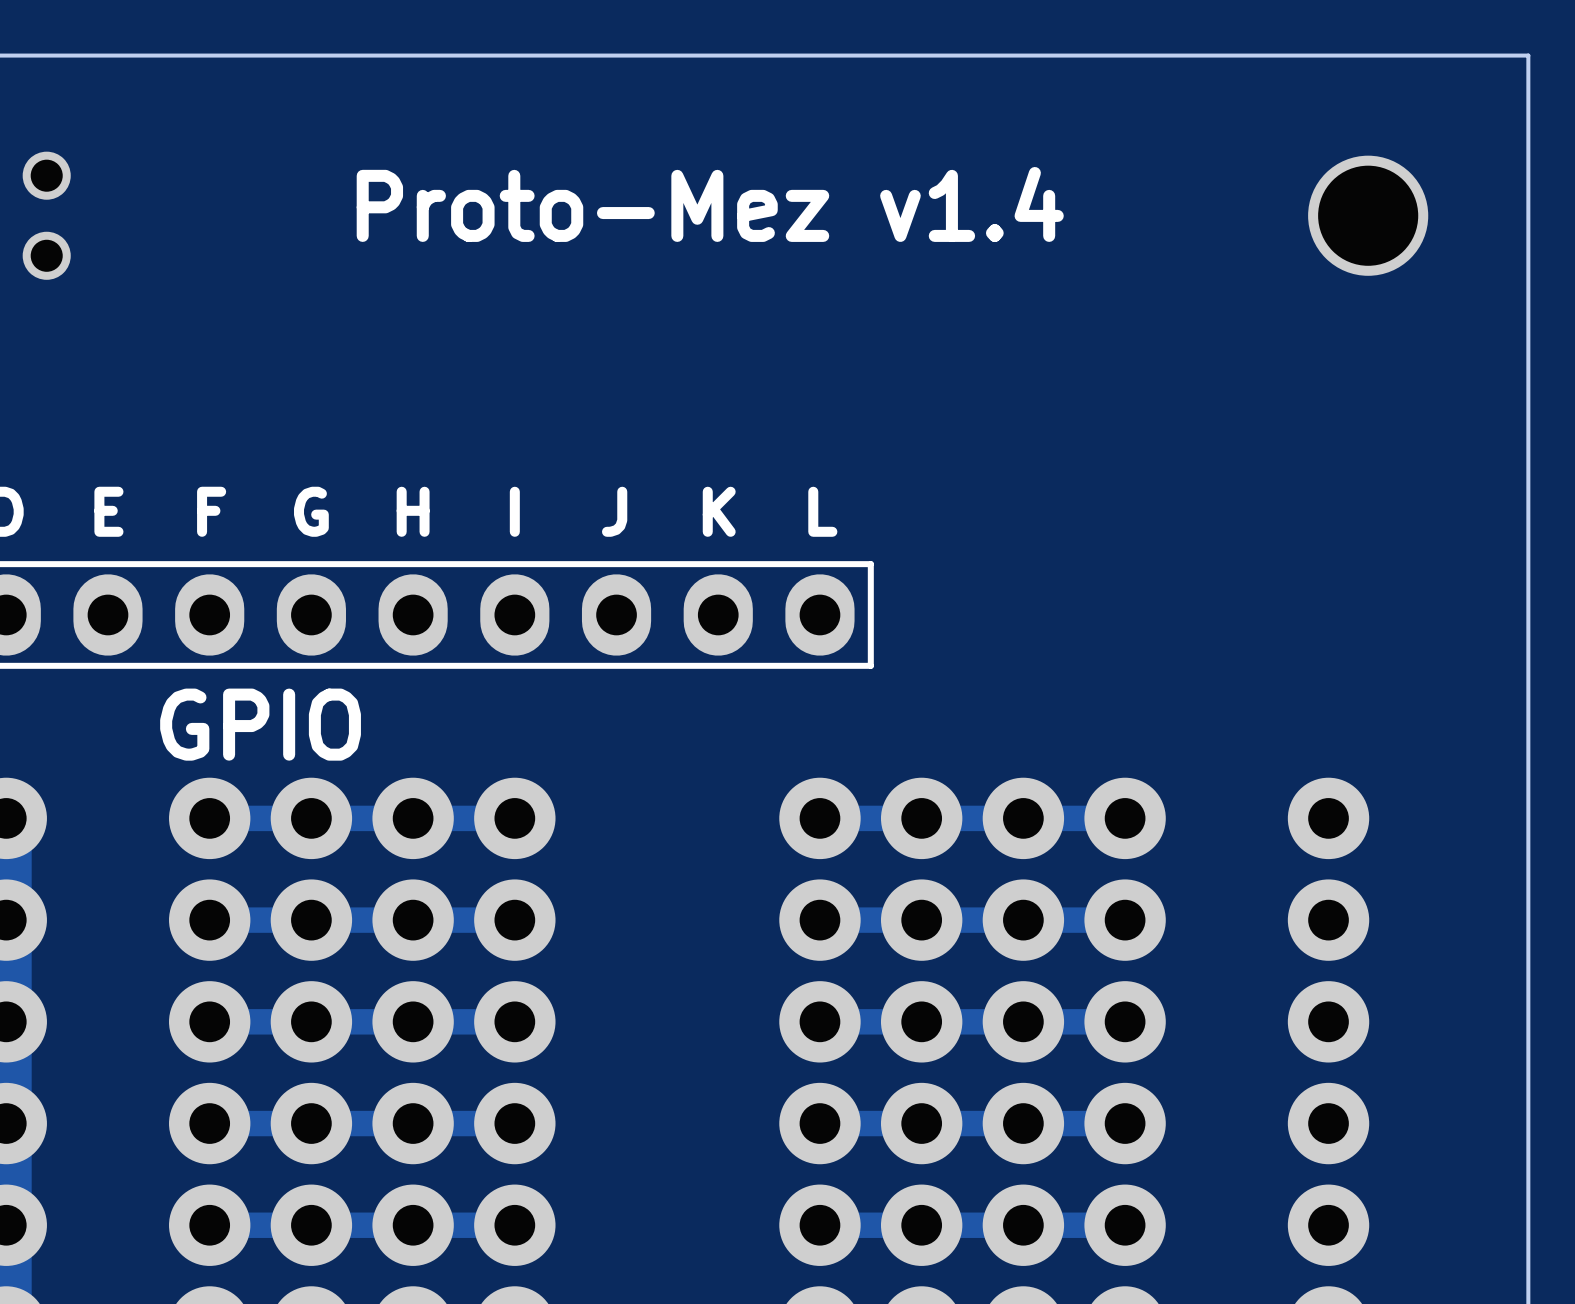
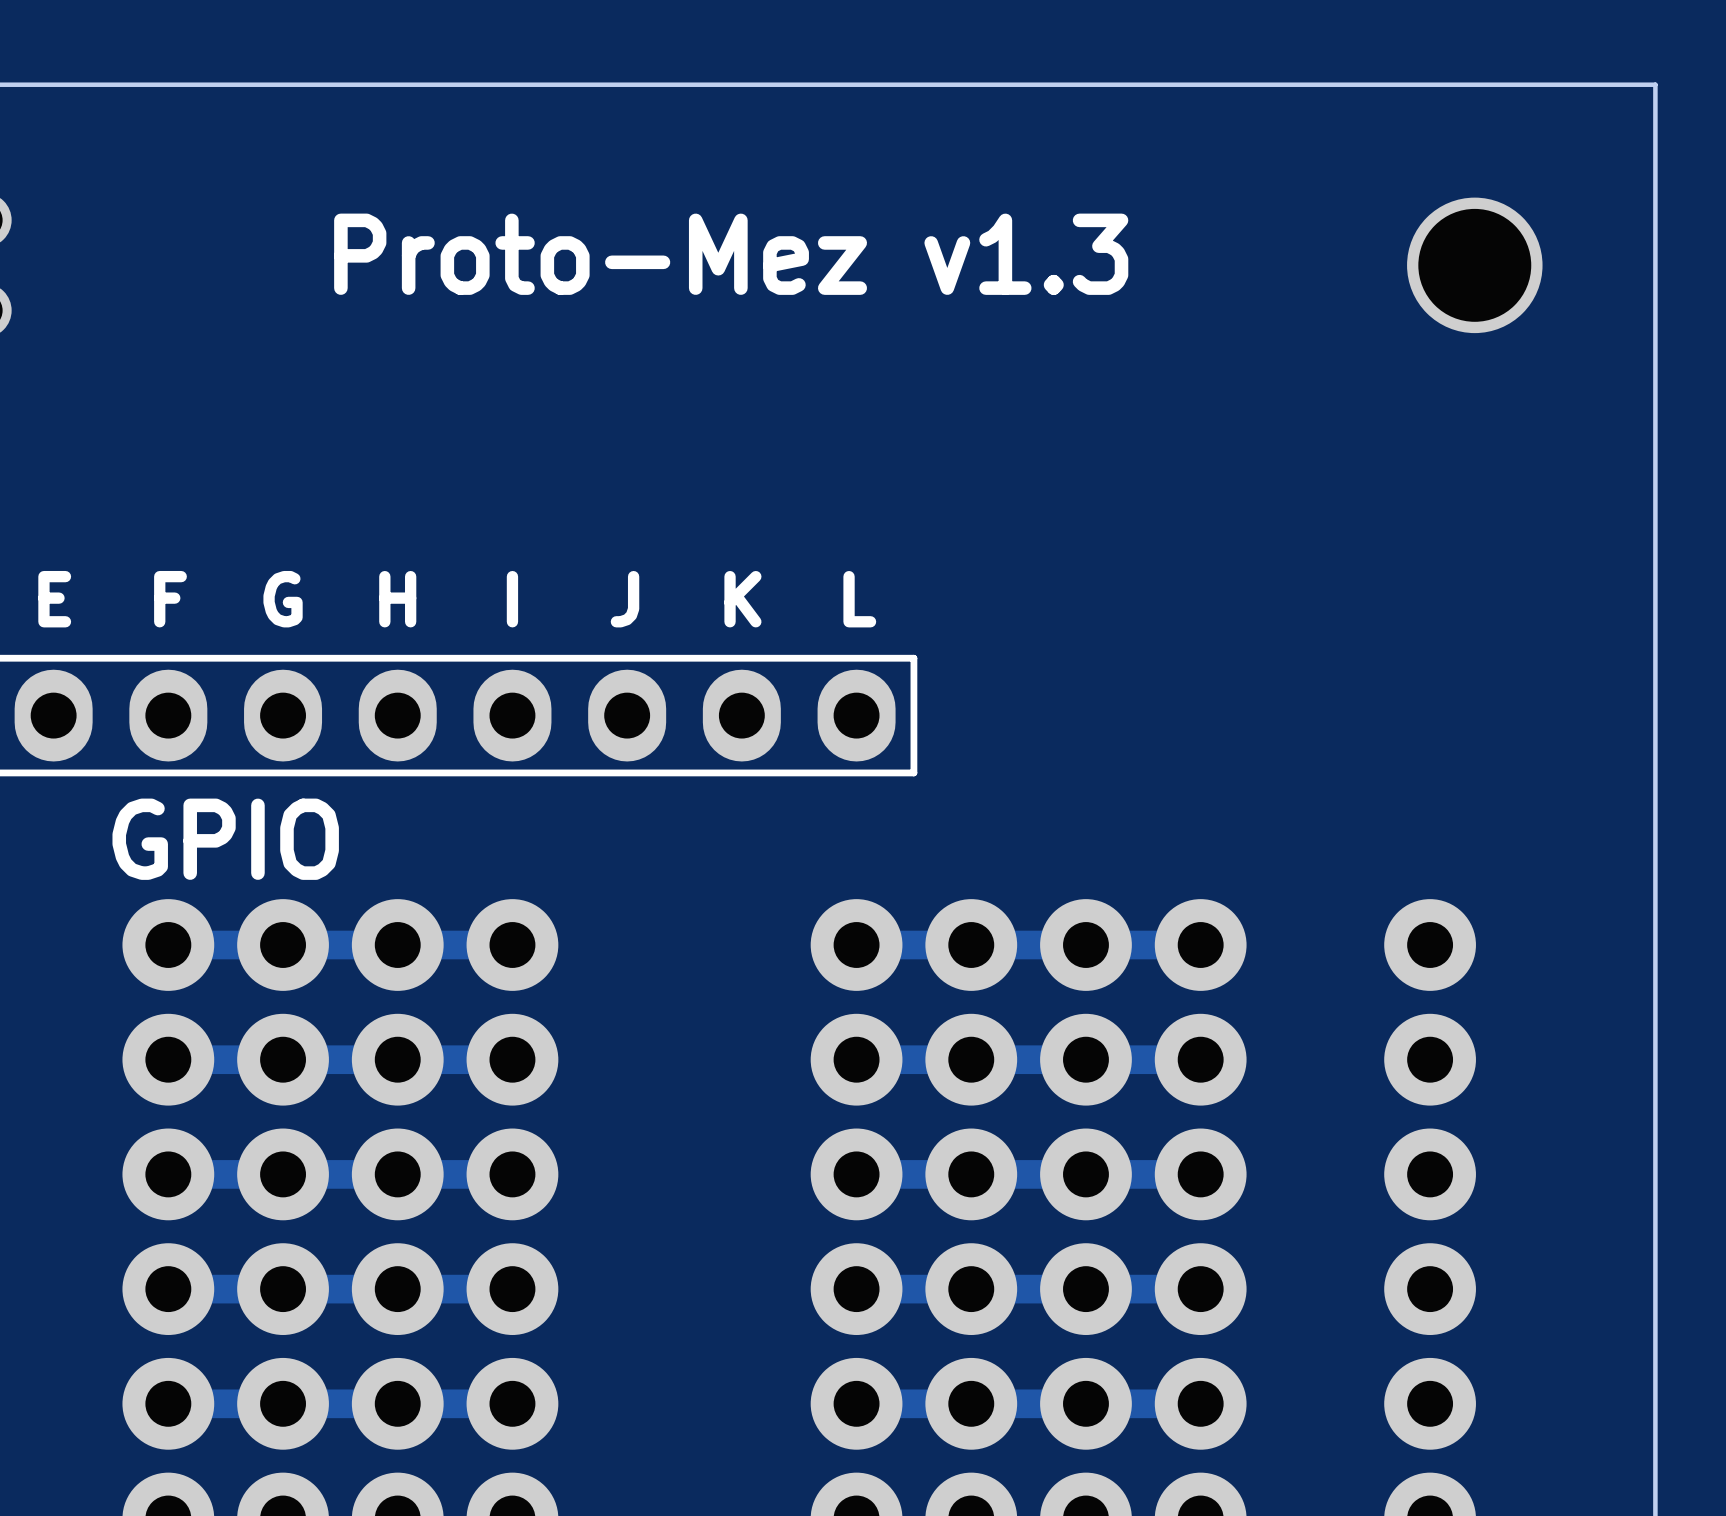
text: Proto-Mez v1.4 (710, 204) -> Proto-Mez v1.3 (731, 254)

